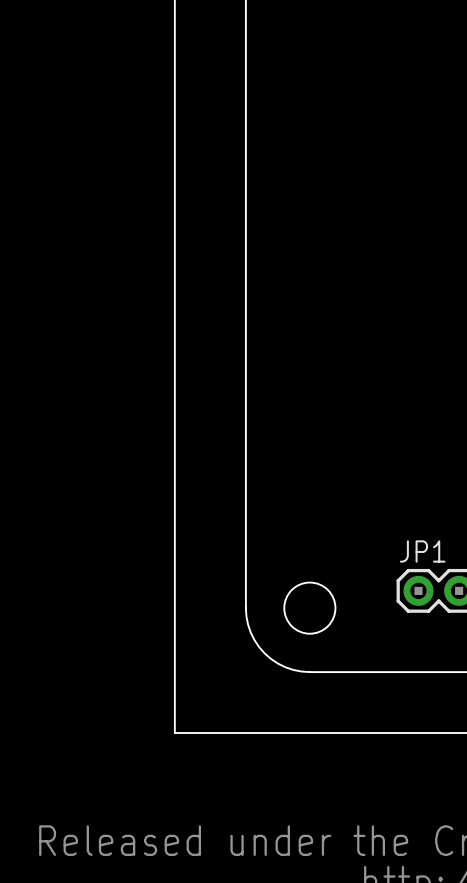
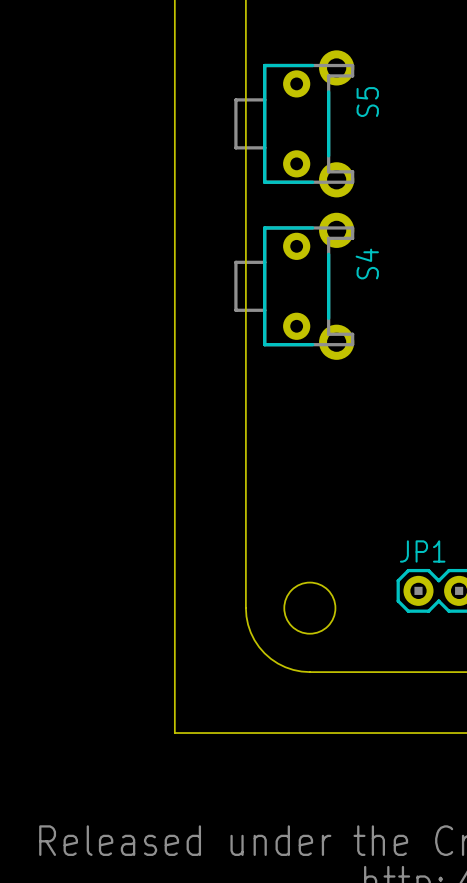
S5: none -> (294, 123)
S4: none -> (294, 286)

